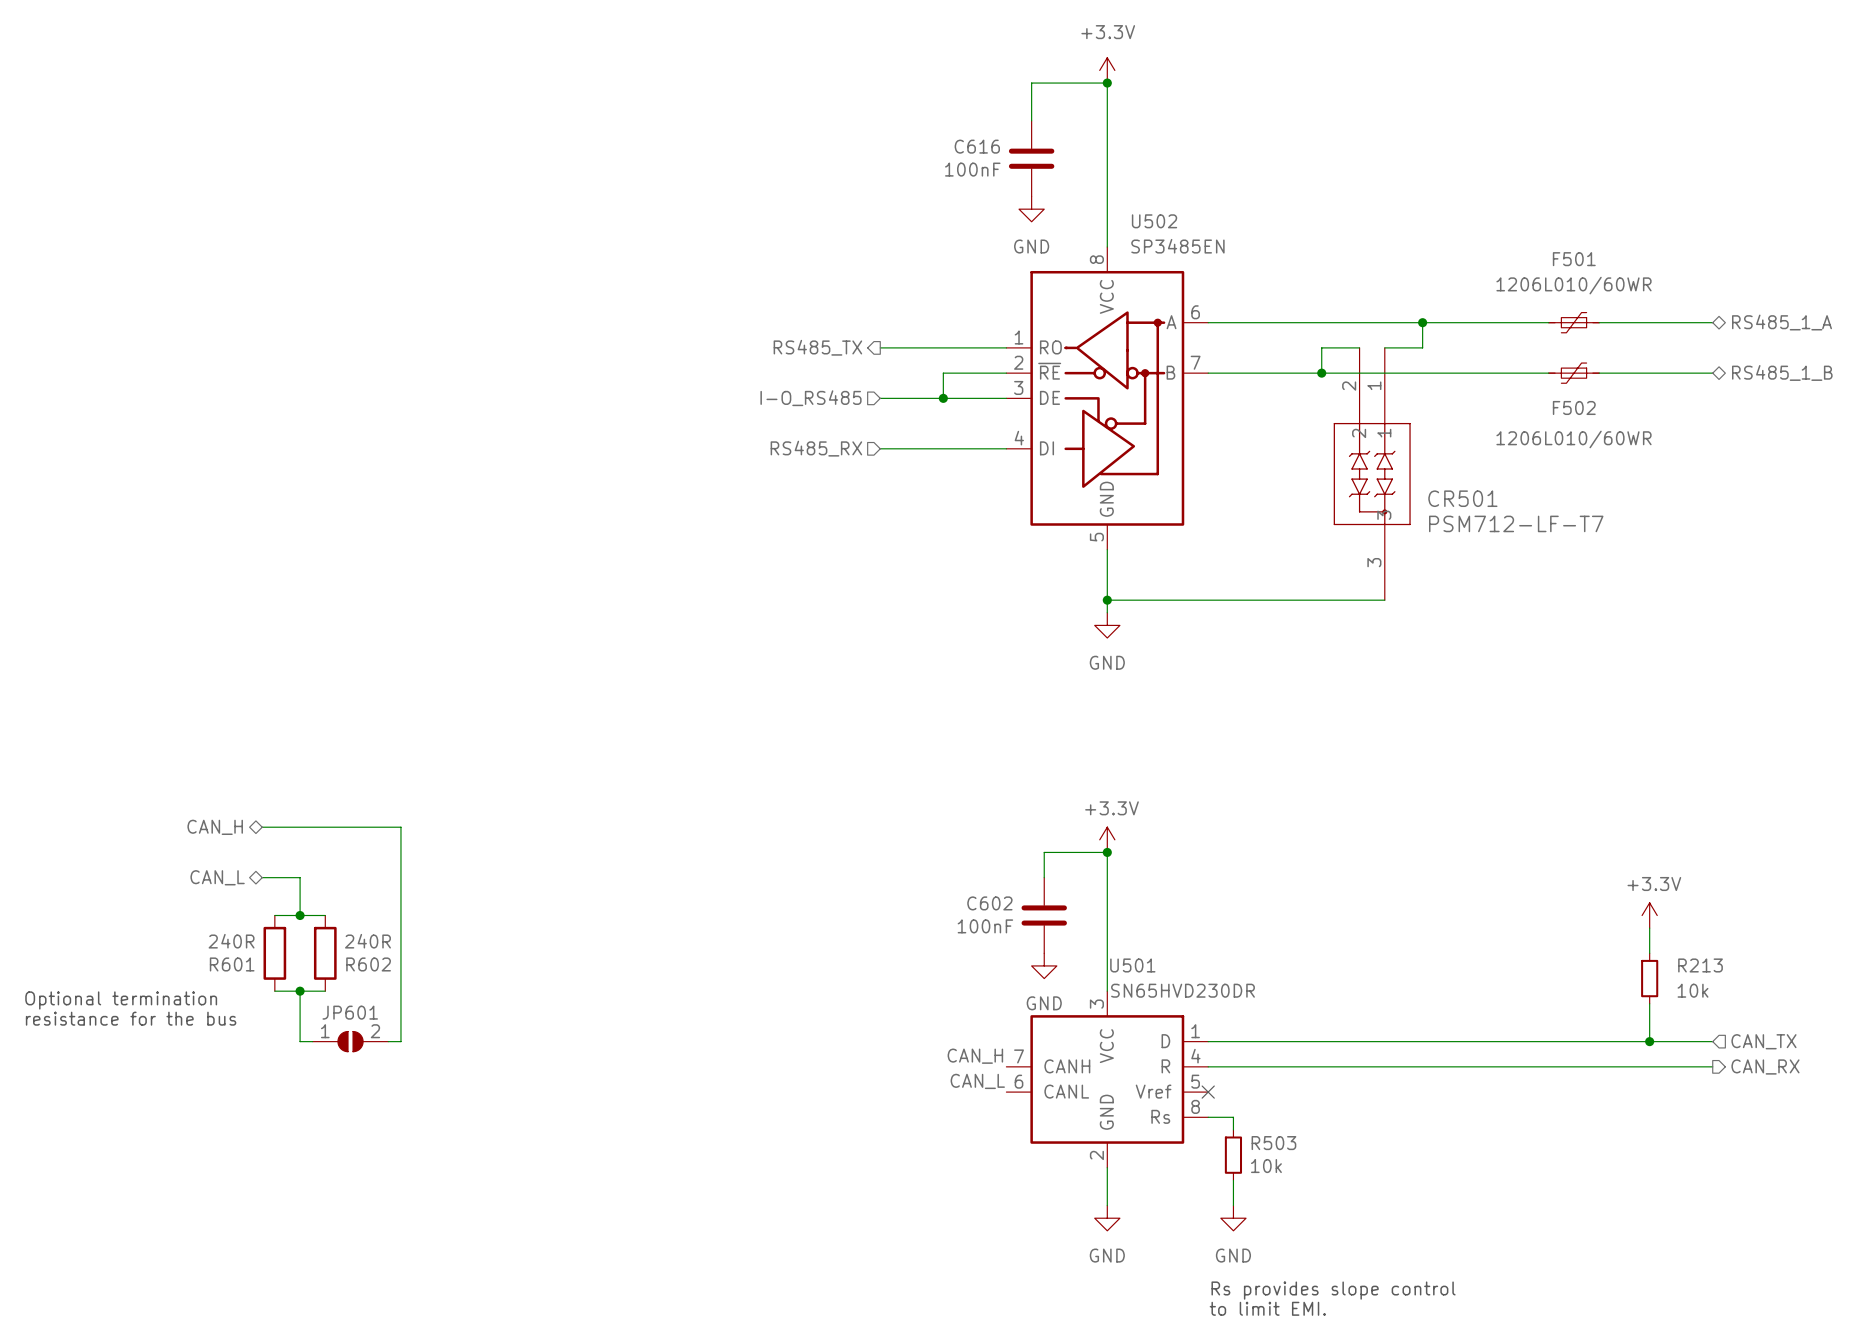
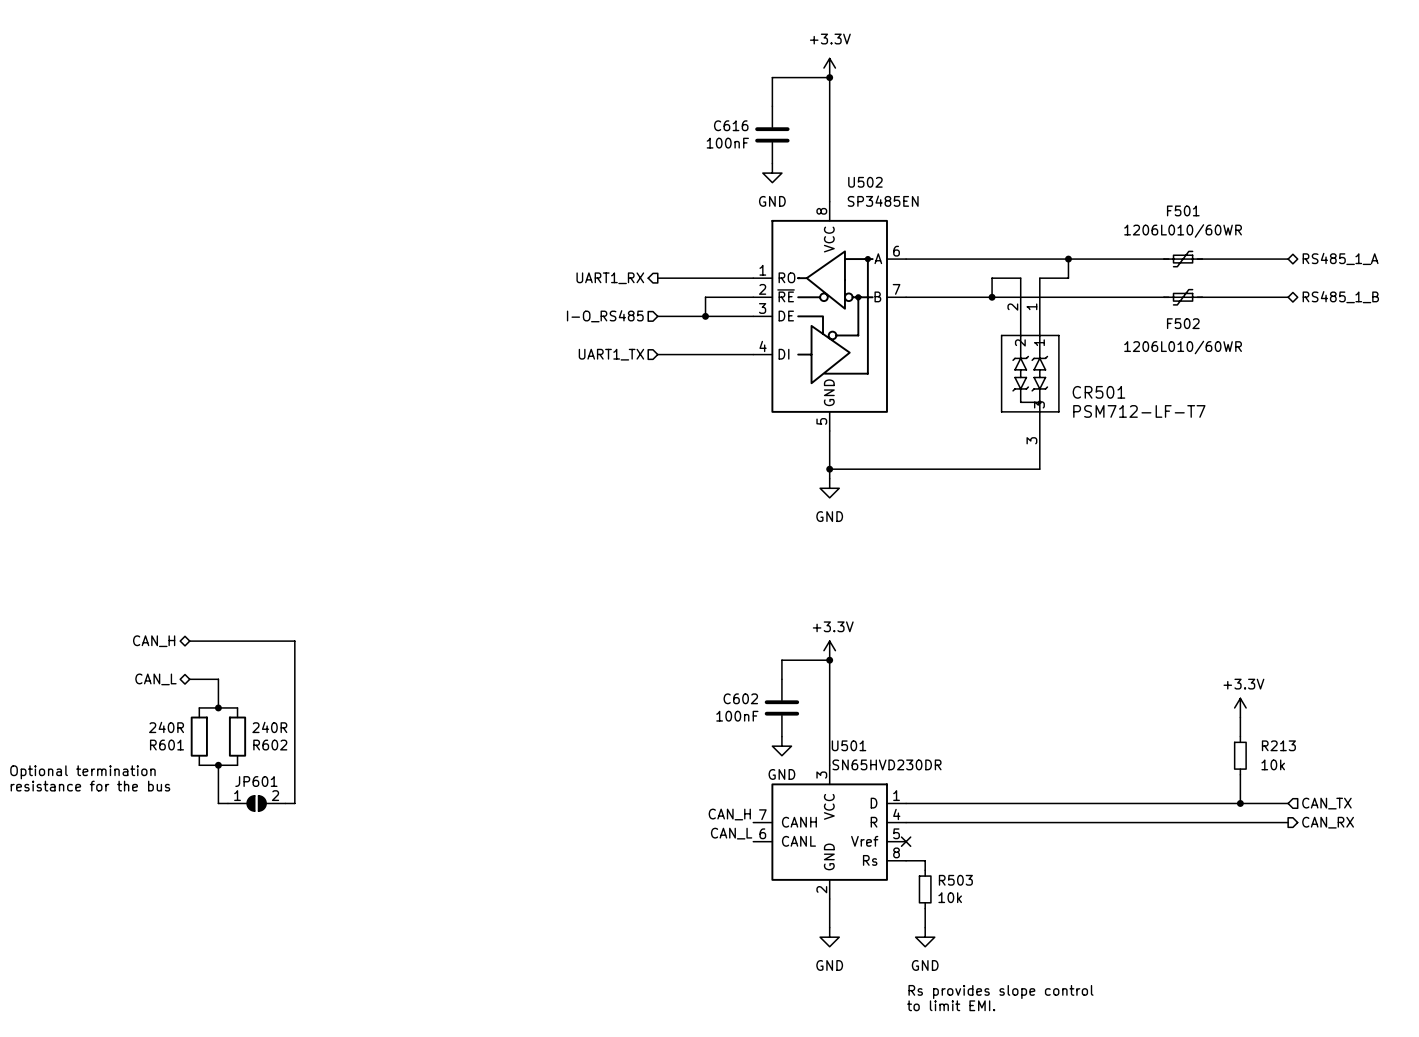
hierarchical label: RS485_TX (817, 347) -> UART1_RX (610, 278)
hierarchical label: RS485_RX (816, 448) -> UART1_TX (611, 354)

